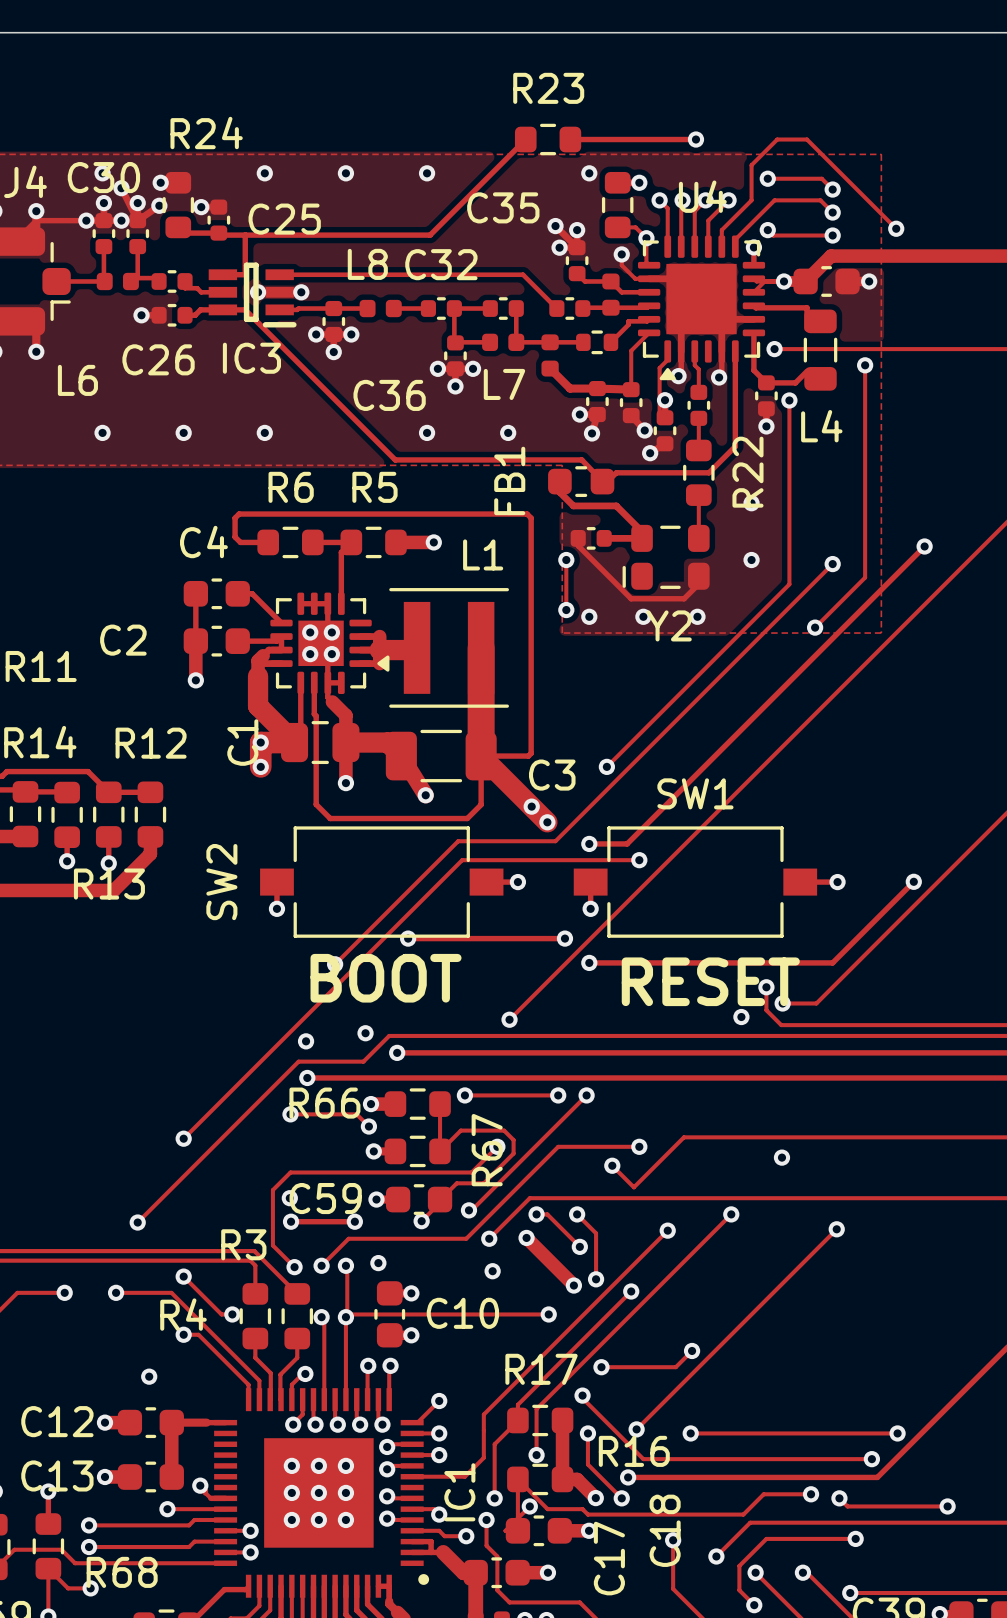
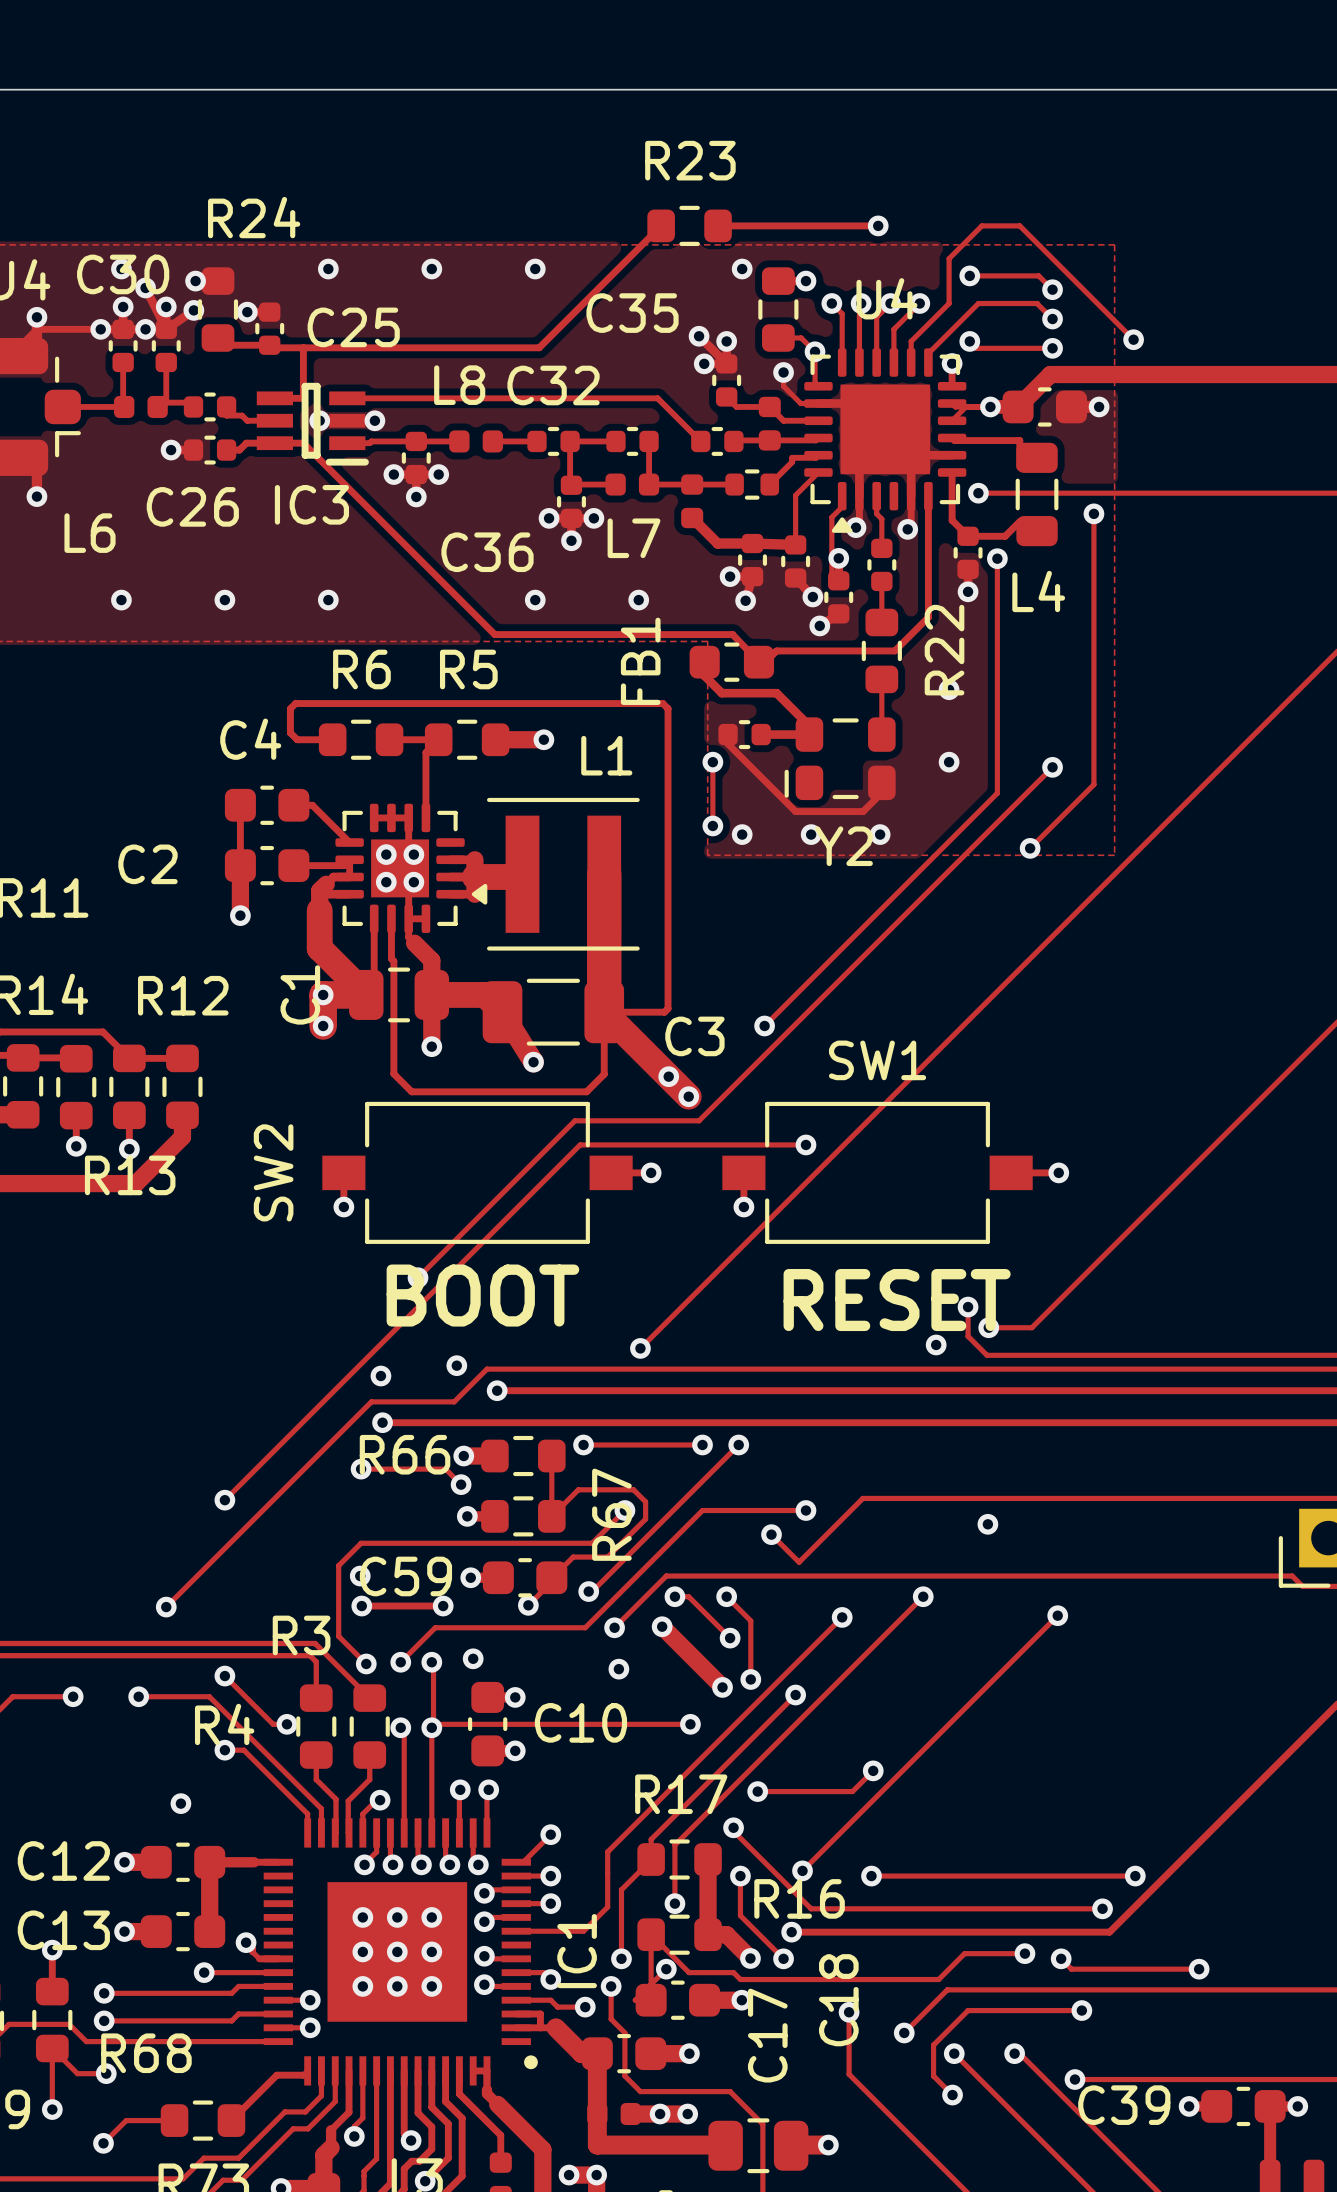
track: (924, 546) (627, 843) (589, 843) -> none
via: (924, 546) -> none
via: (589, 843) -> none
track: (913, 881) (832, 962) (589, 962) -> none
via: (913, 881) -> none
track: (408, 938) (564, 938) -> none
via: (408, 938) -> none
via: (564, 938) -> none
via: (589, 962) -> none

